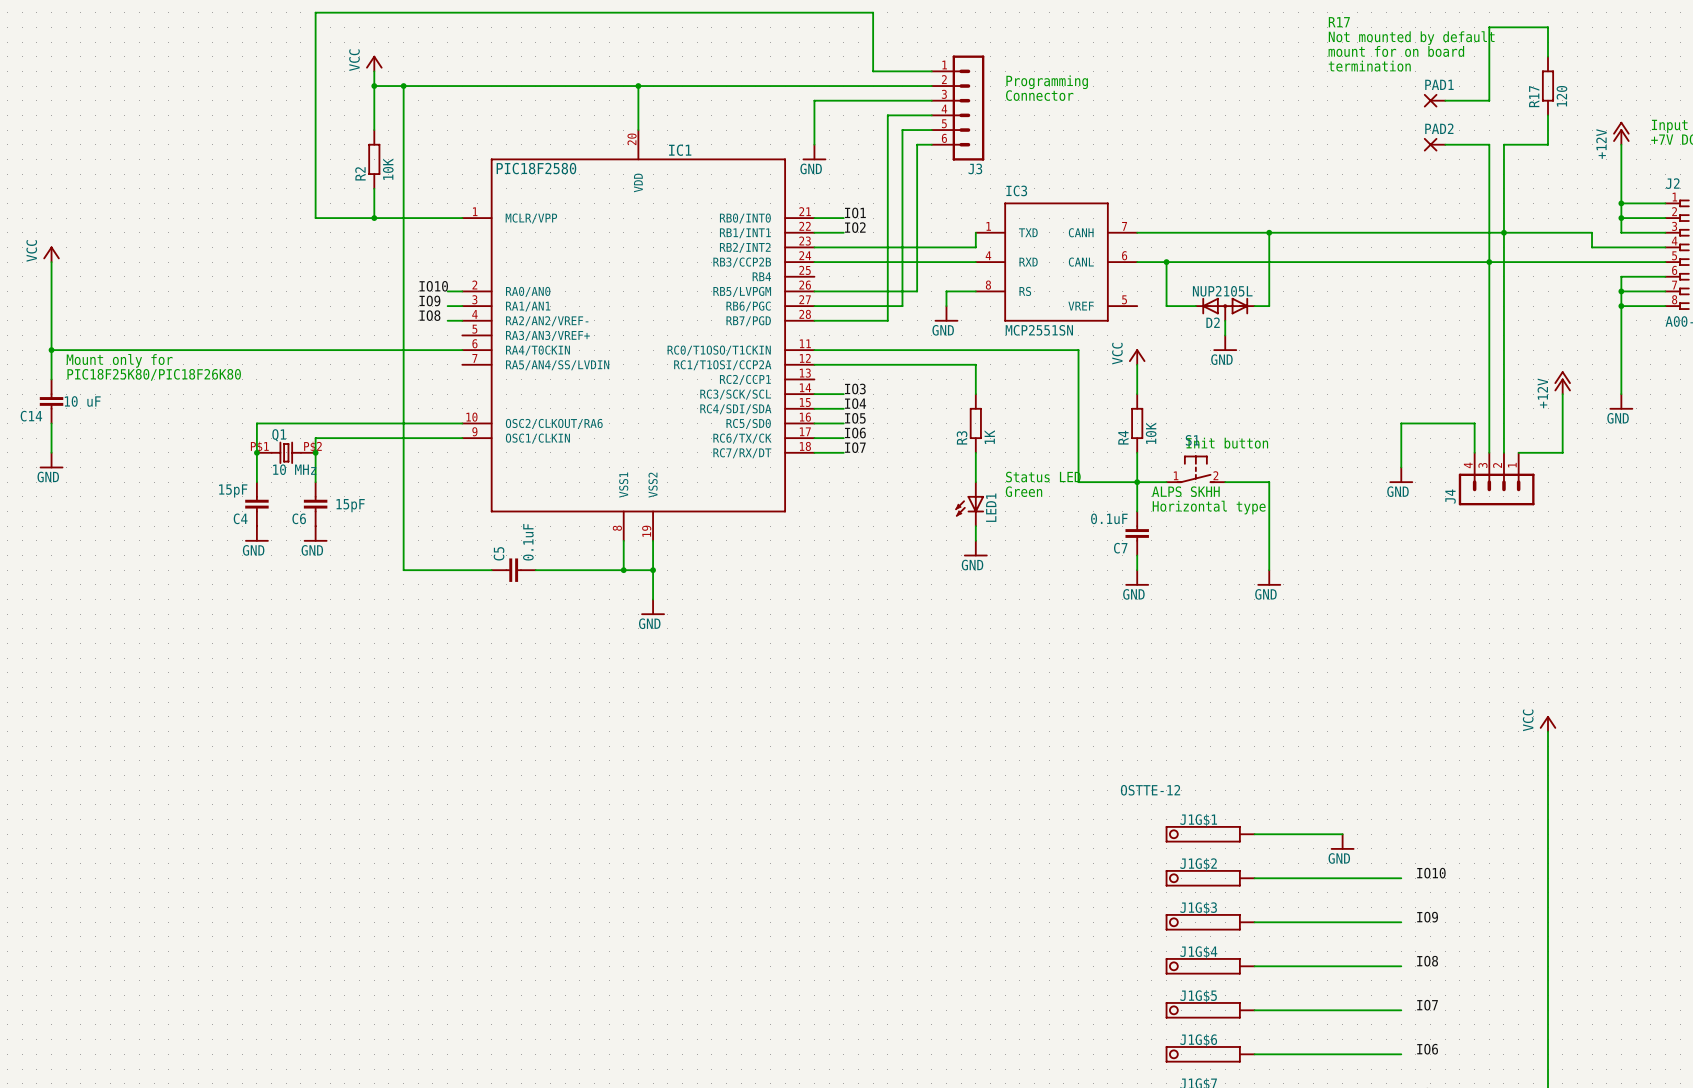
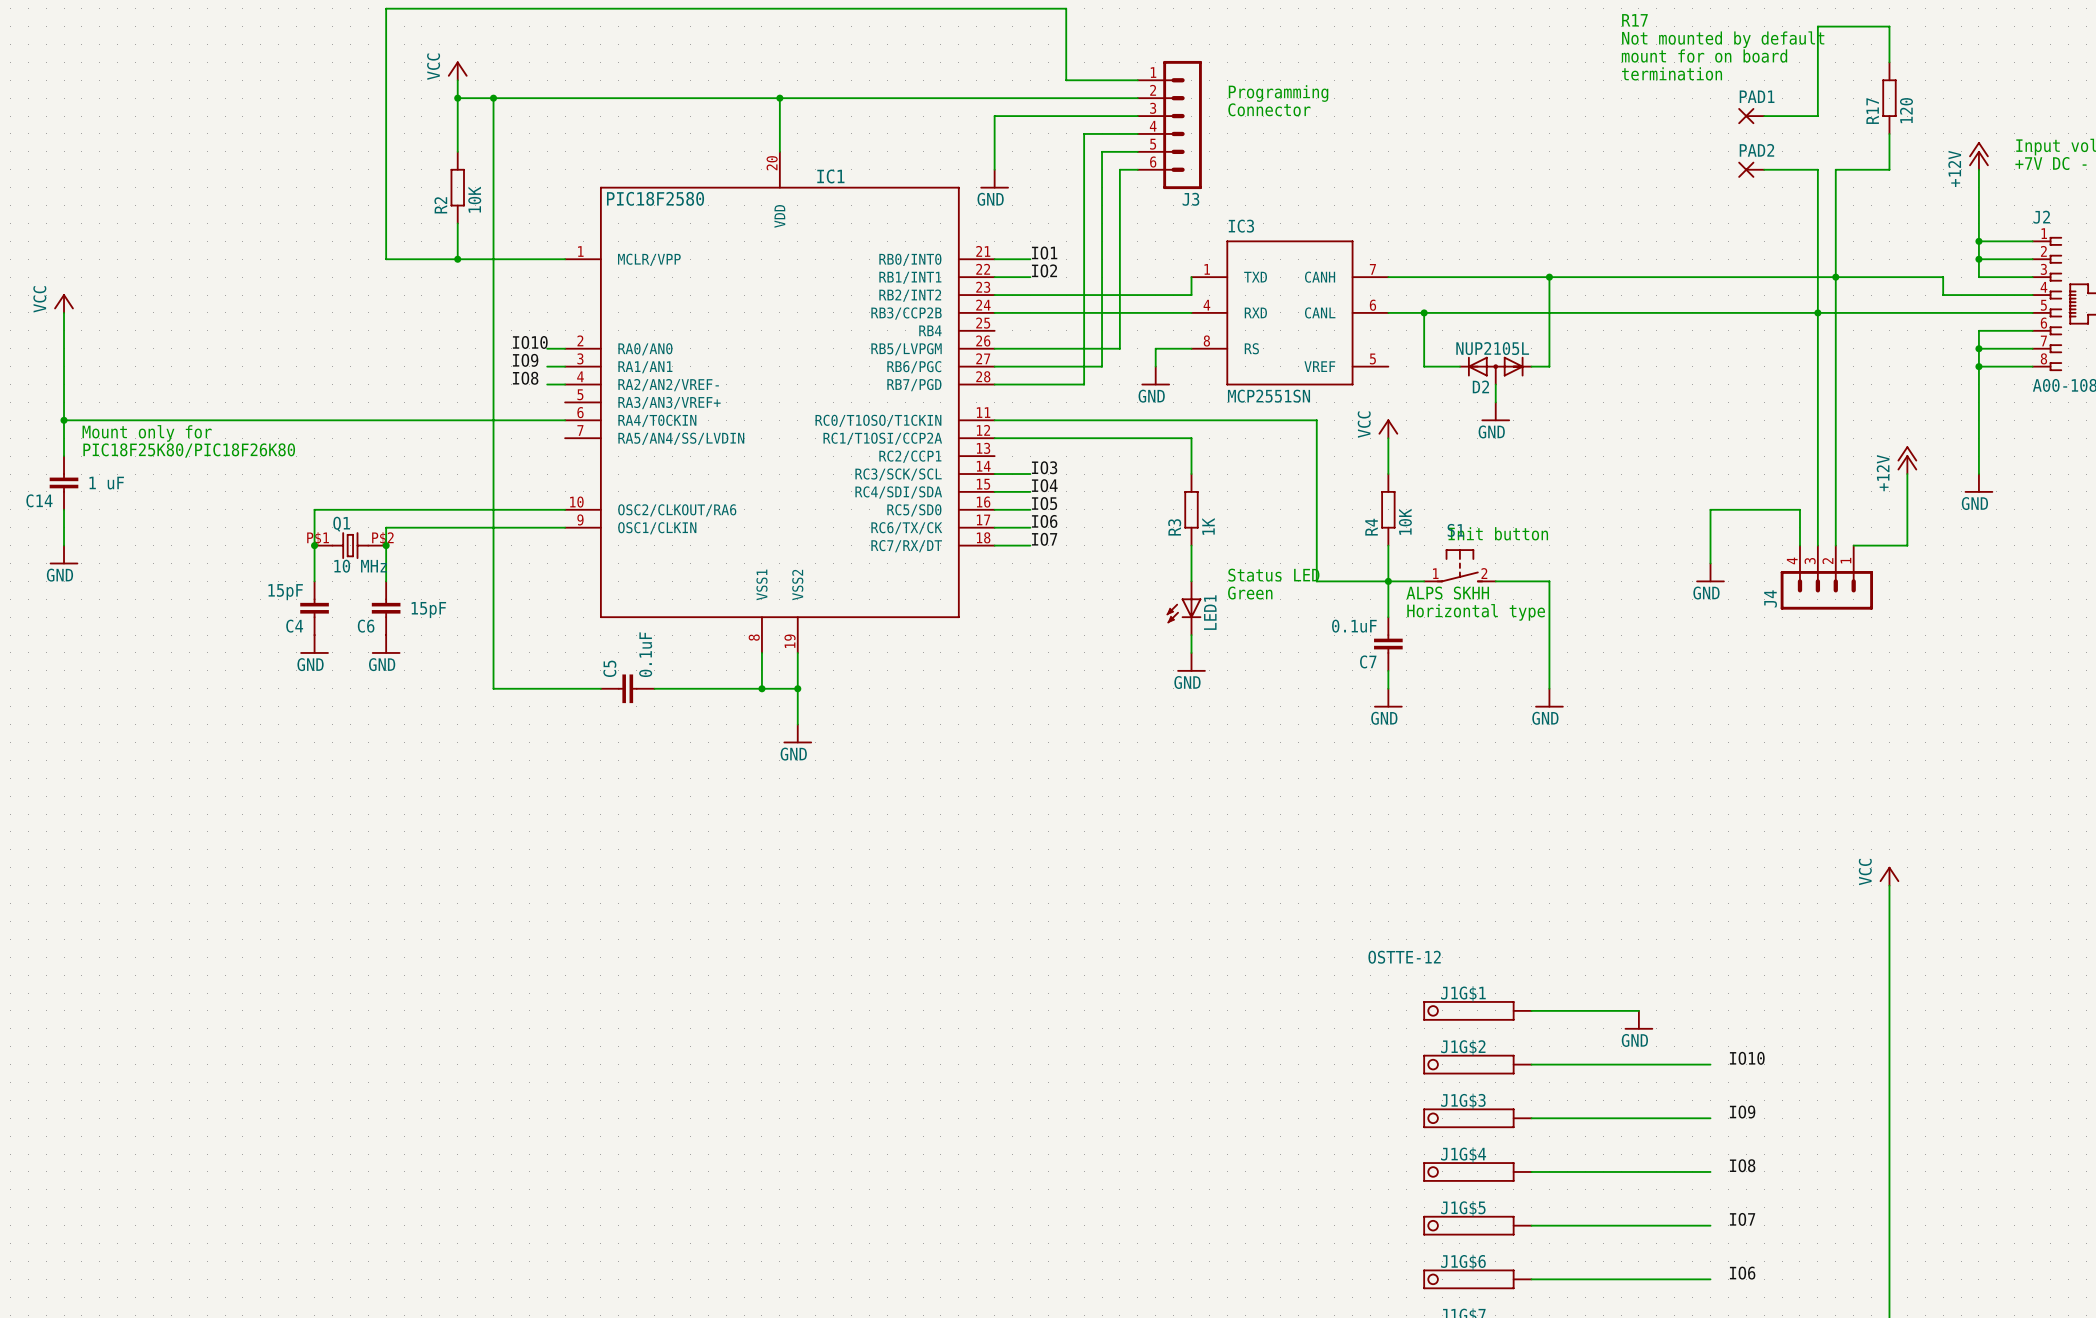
C14 value: 10 uF (82, 401) -> 1 uF (106, 483)

